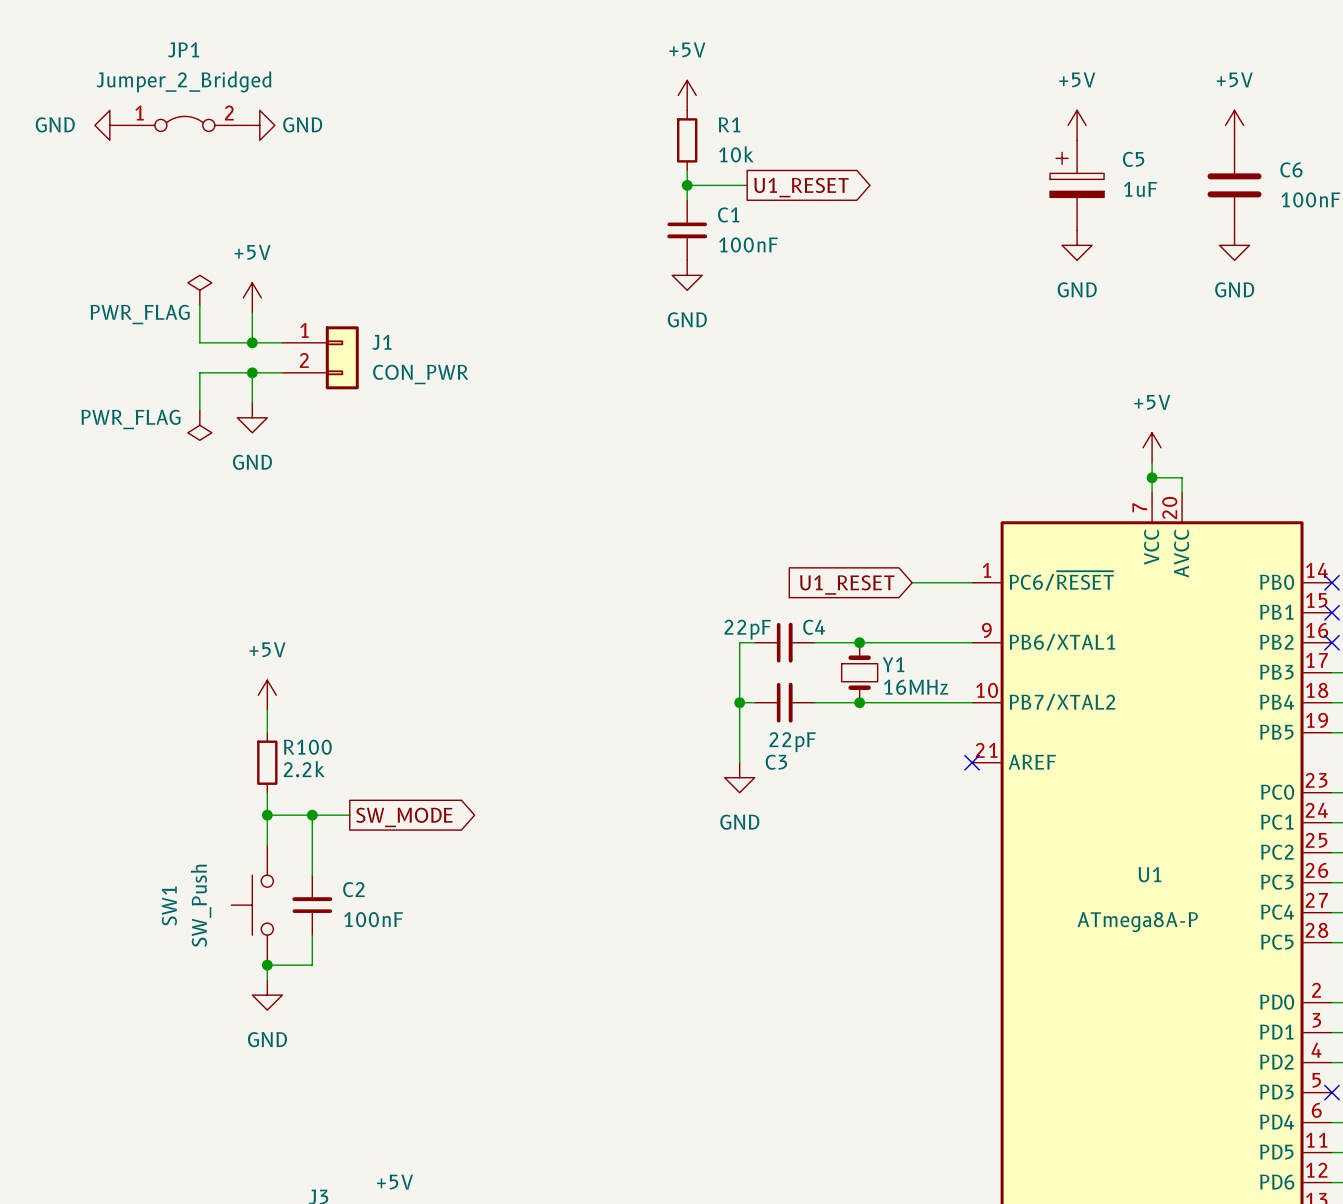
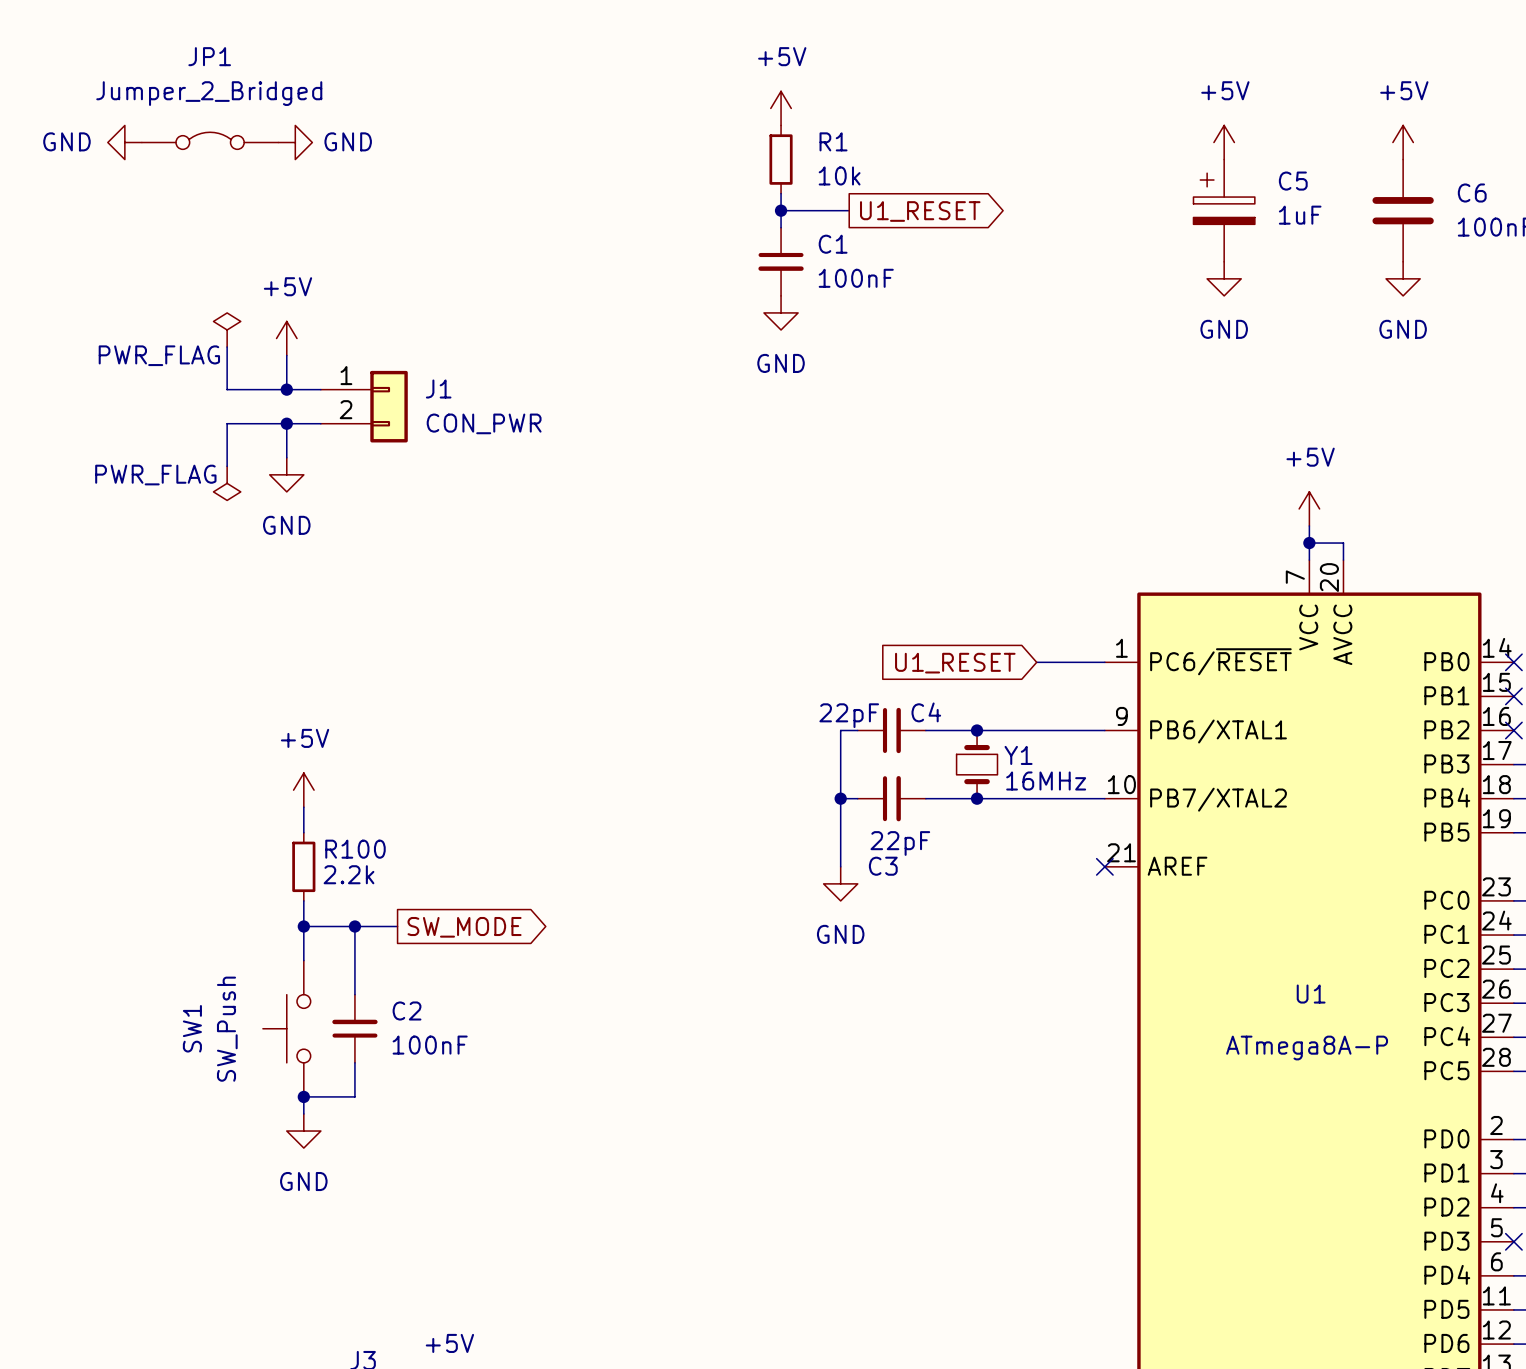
JP1 pin number: 1 (139, 113) -> none
JP1 pin number: 2 (229, 113) -> none

